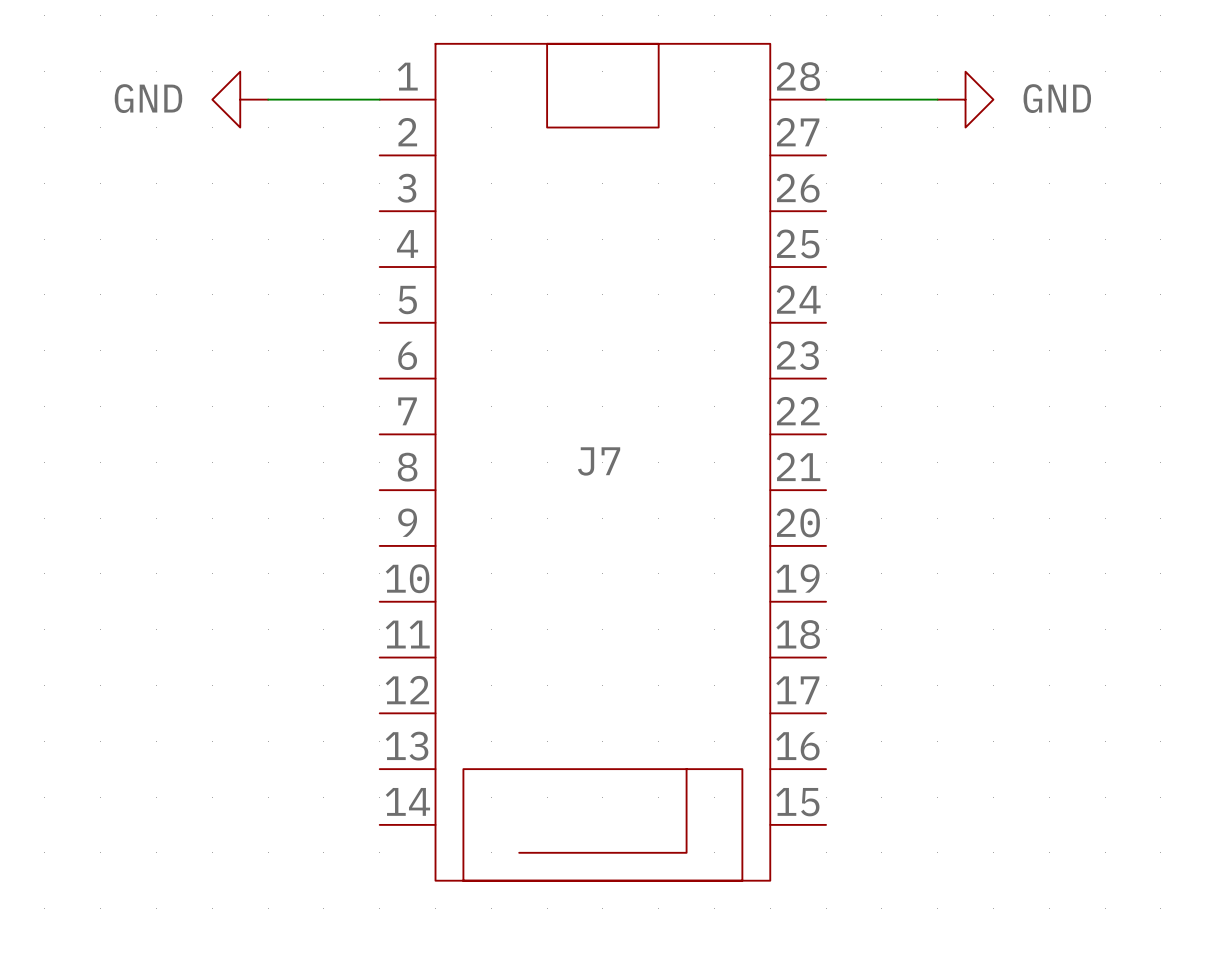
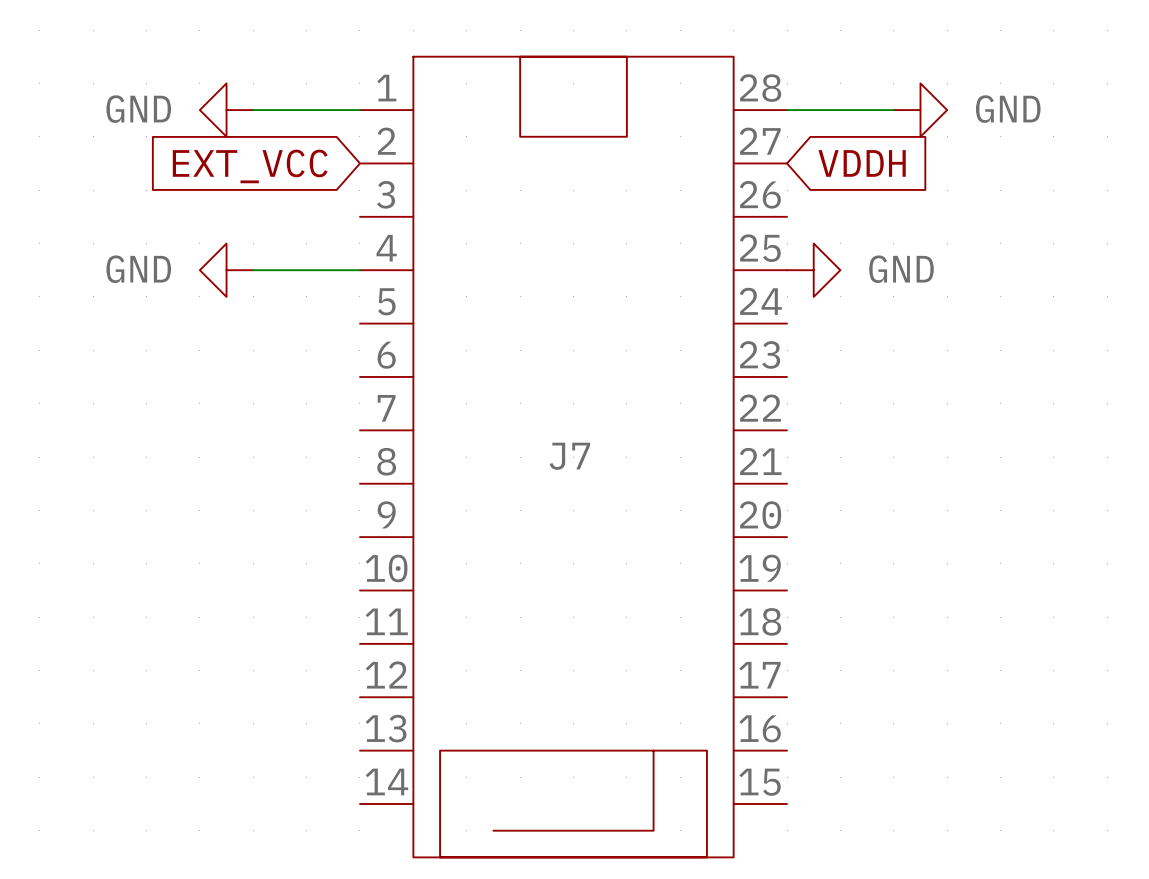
global label: none -> VDDH (862, 163)
global label: none -> EXT_VCC (250, 166)
power symbol: none -> GND (226, 270)
wire: none -> (253, 270) (359, 270)
power symbol: none -> GND (813, 270)

